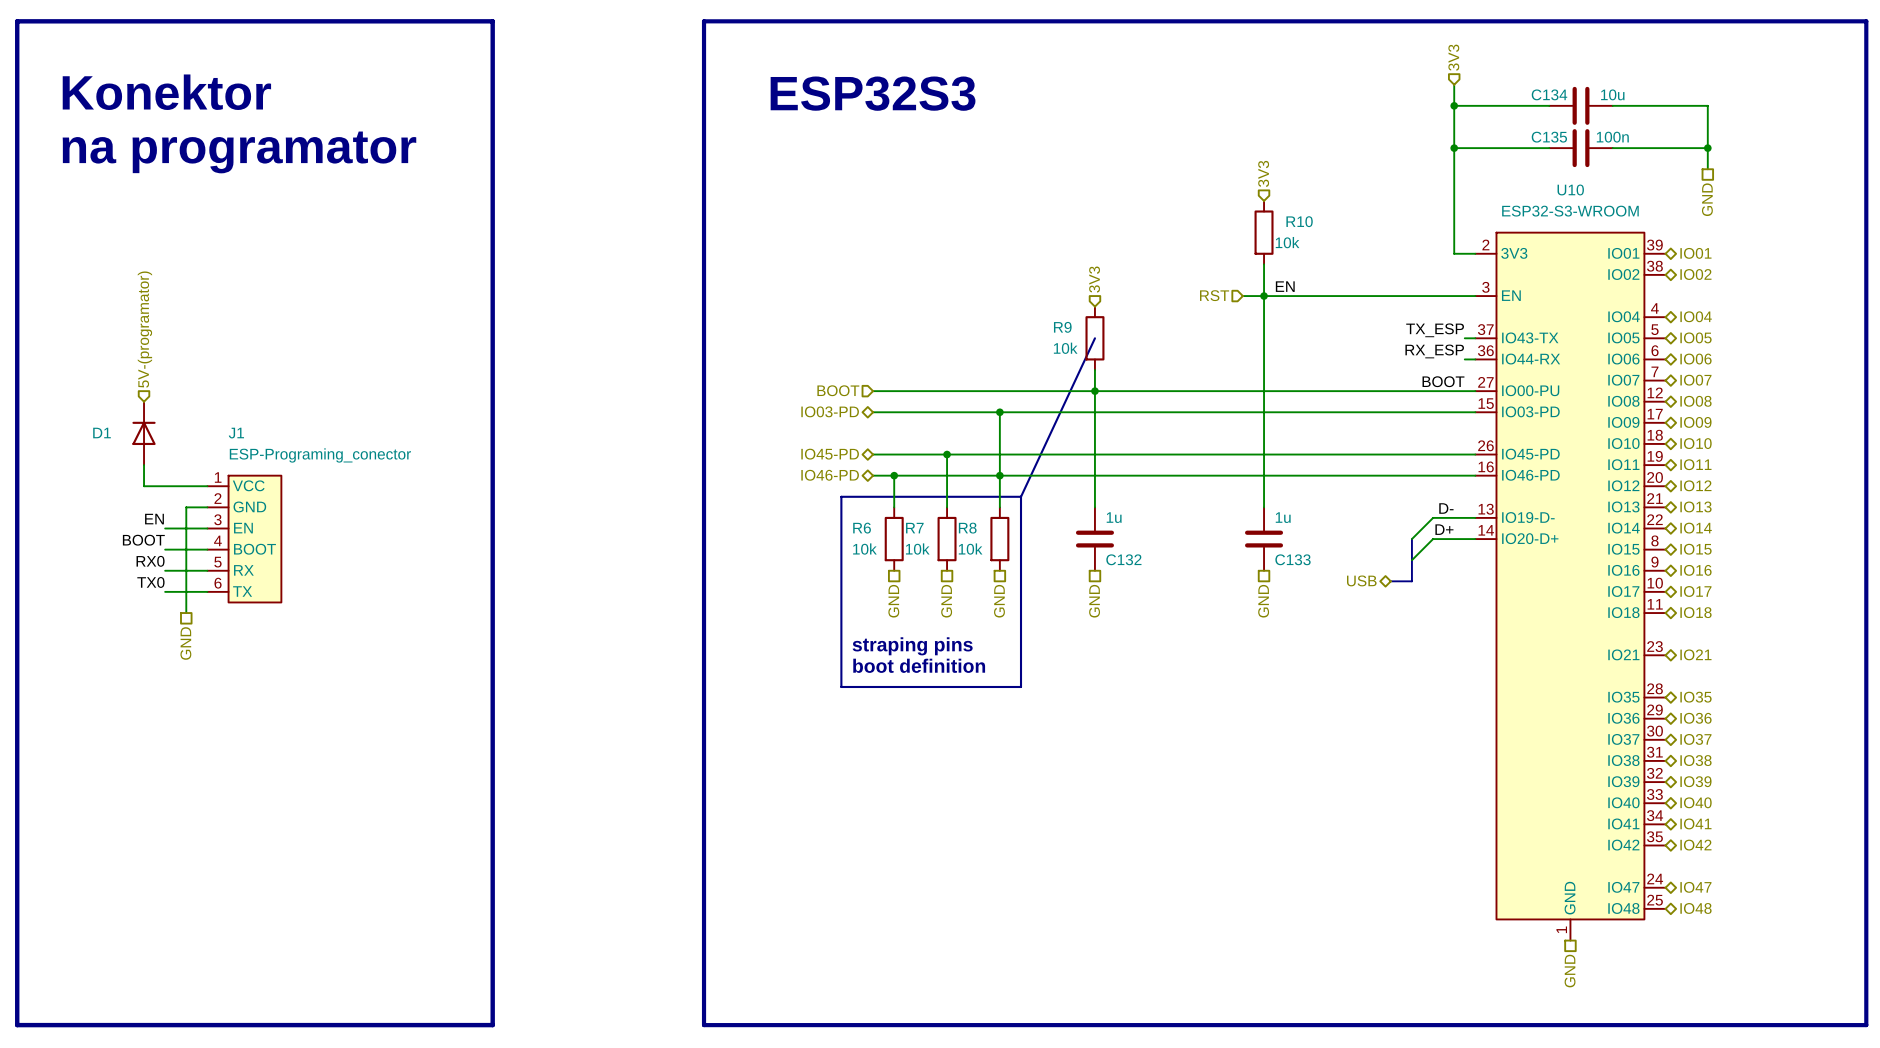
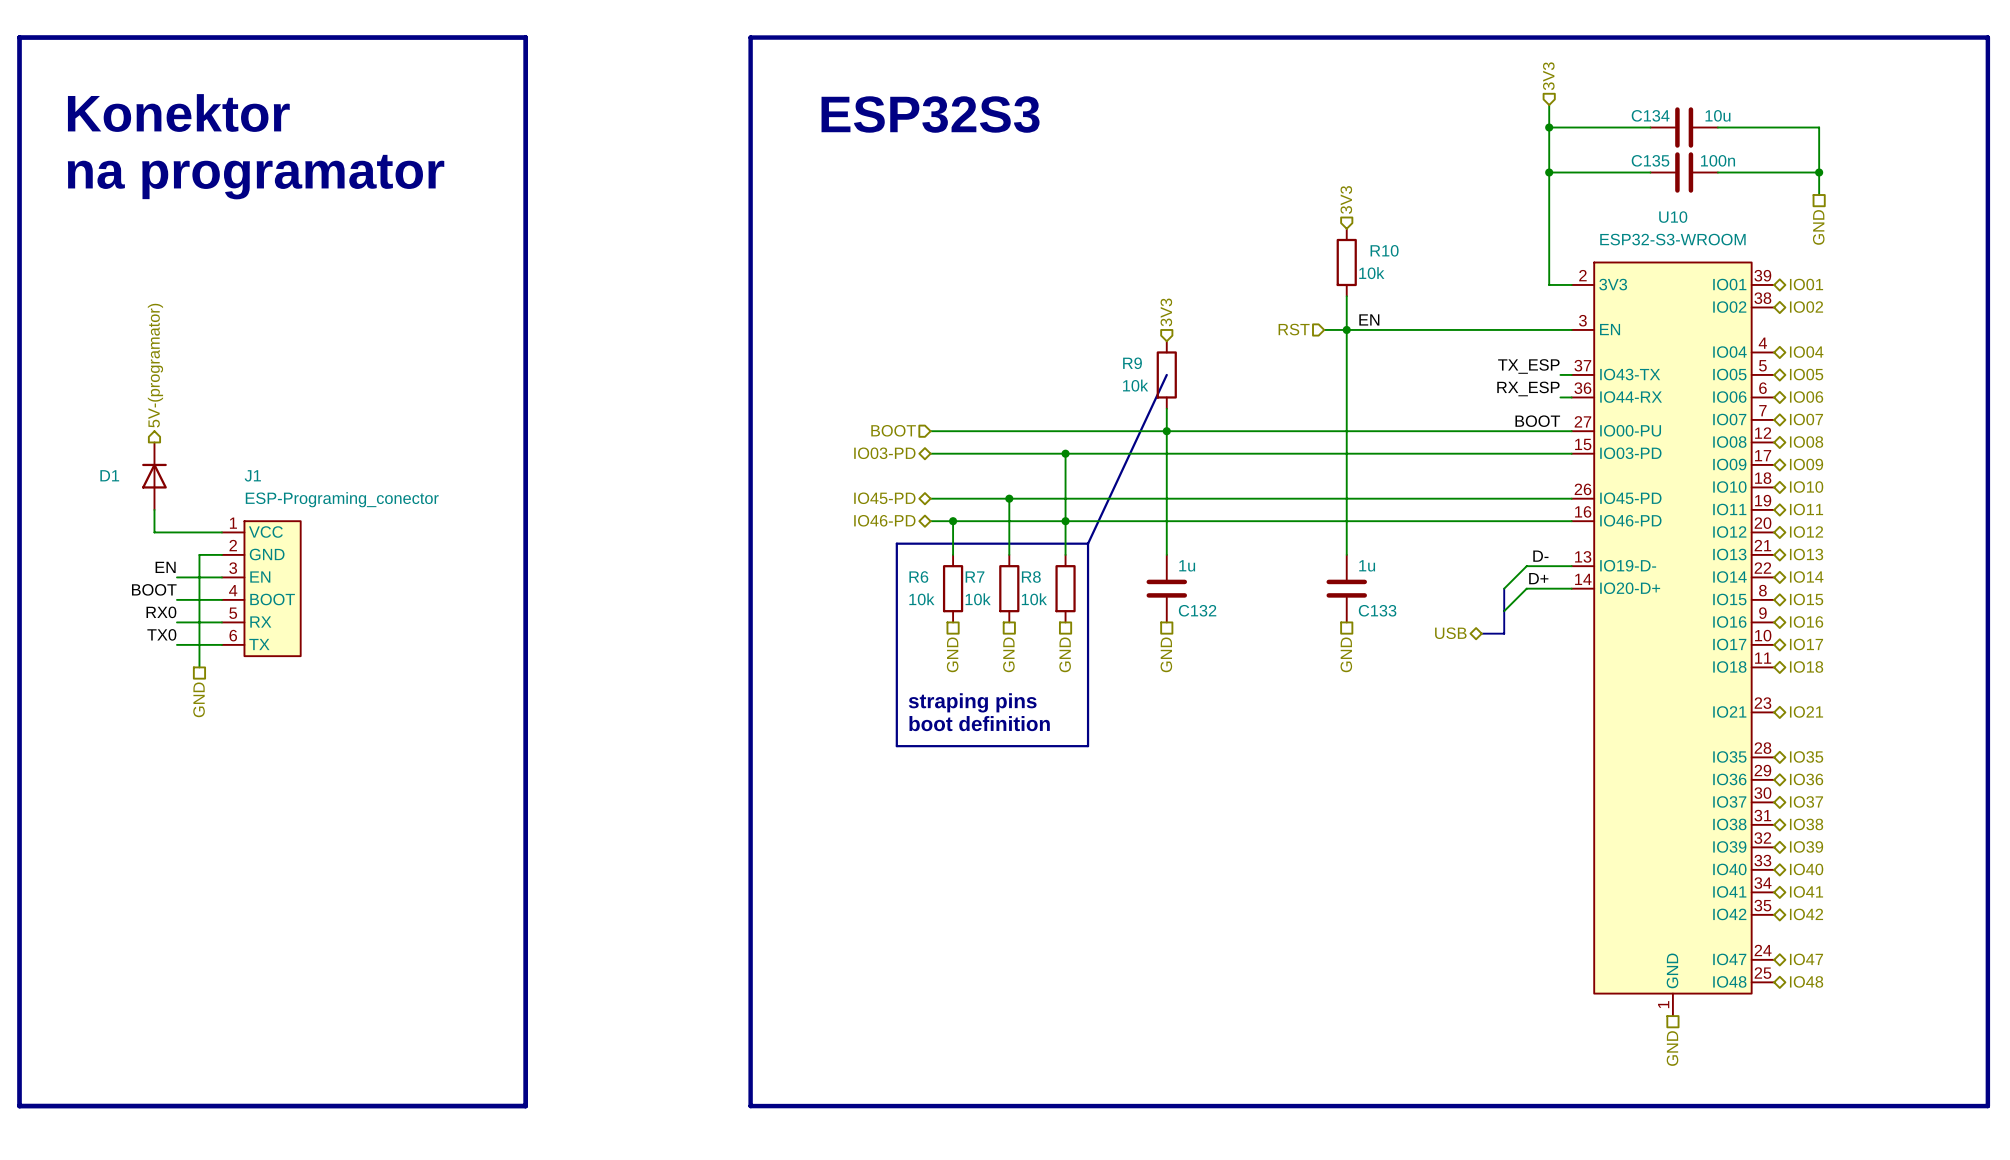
hierarchical label shape: input (144, 329) -> output (155, 365)

